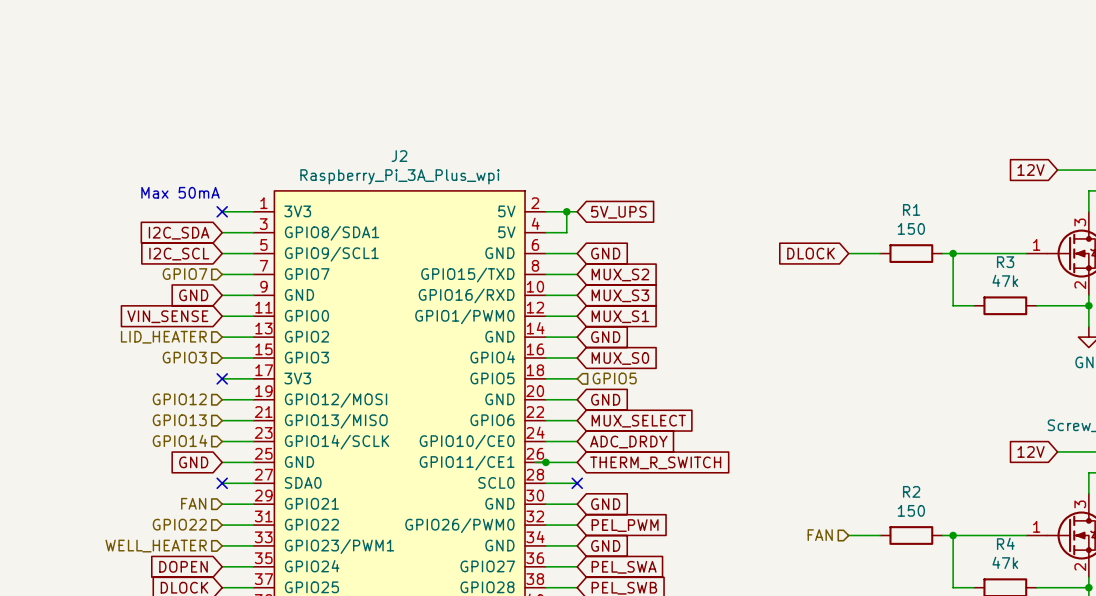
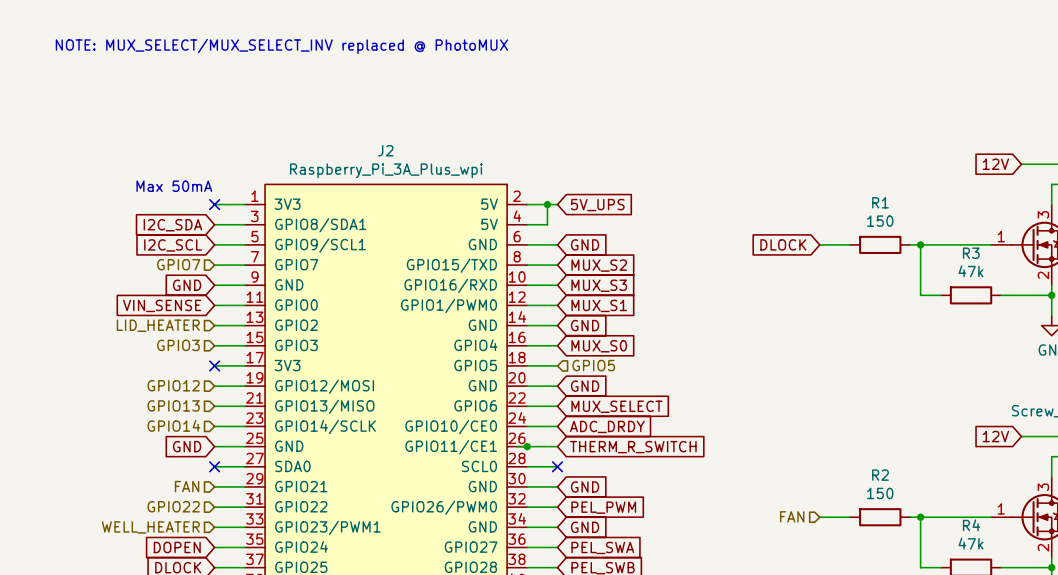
text: none -> NOTE: MUX_SELECT/MUX_SELECT_INV replaced @ PhotoMUX (281, 46)

